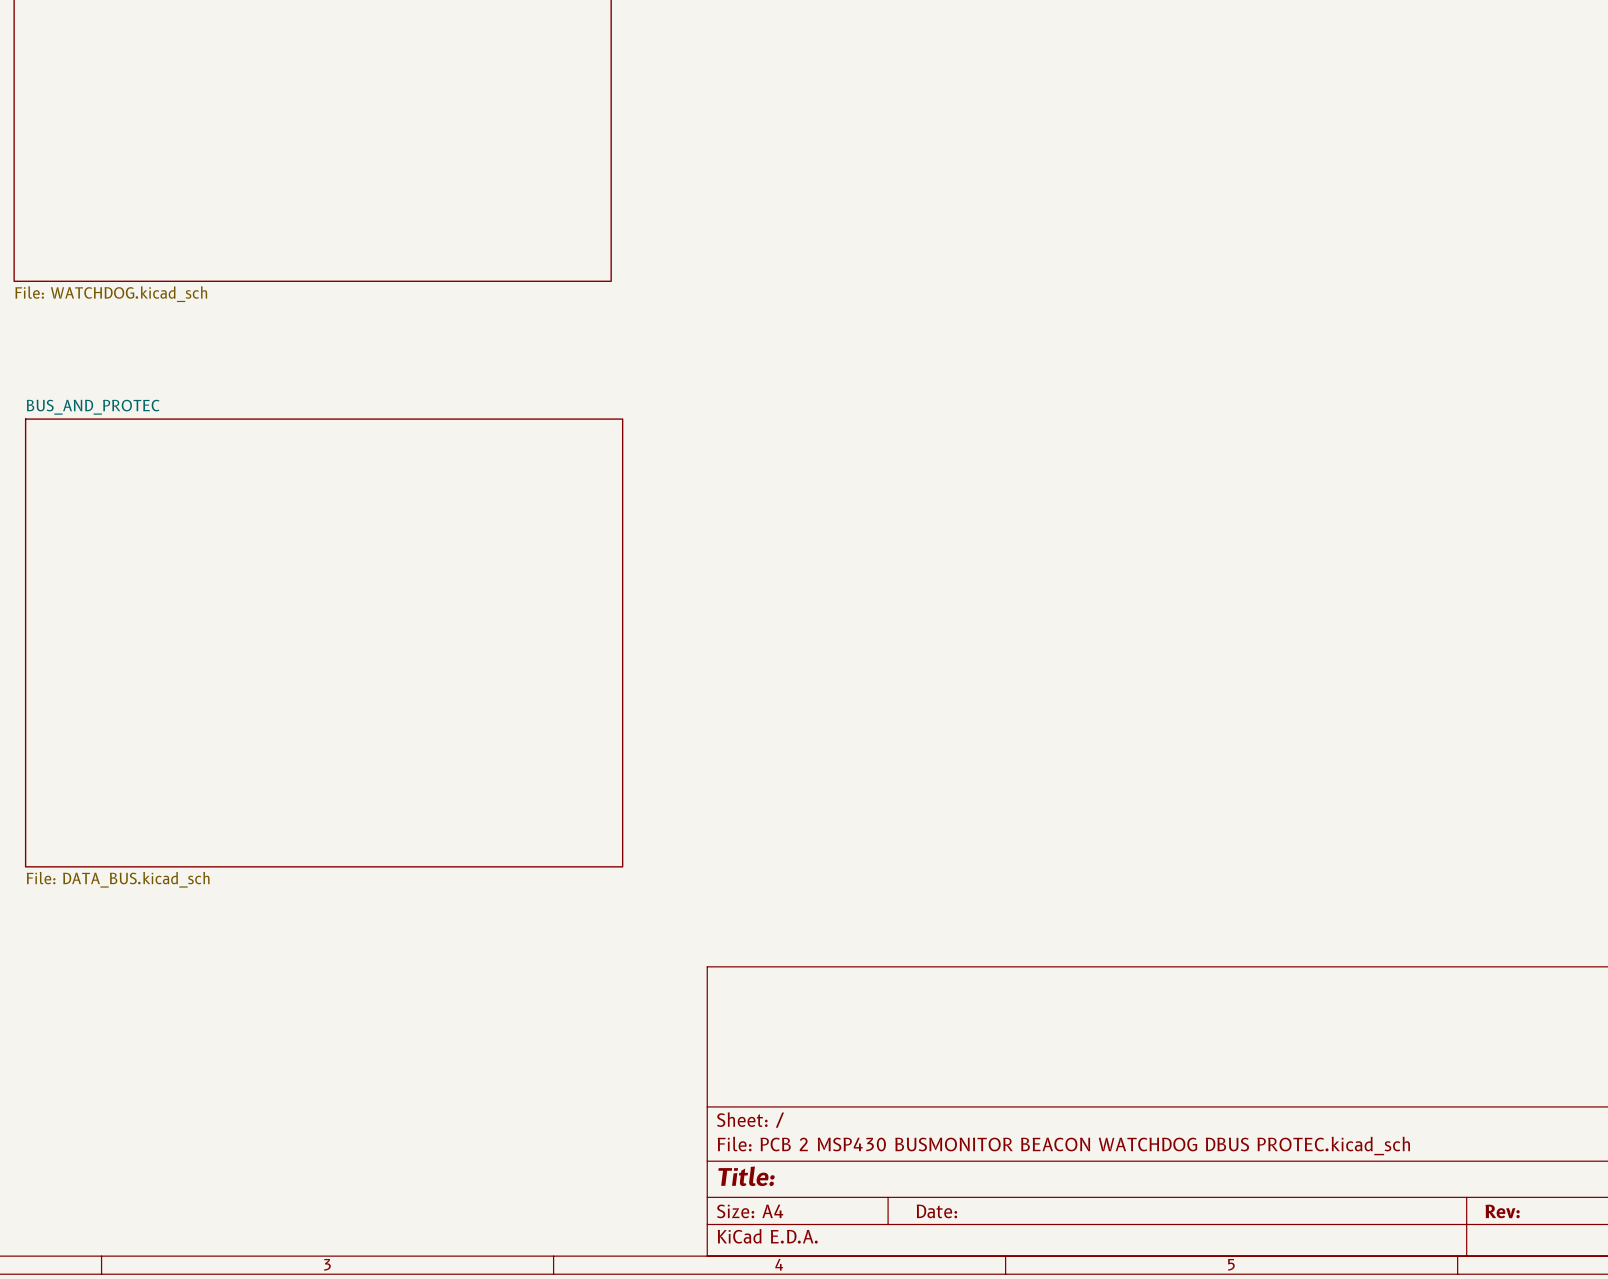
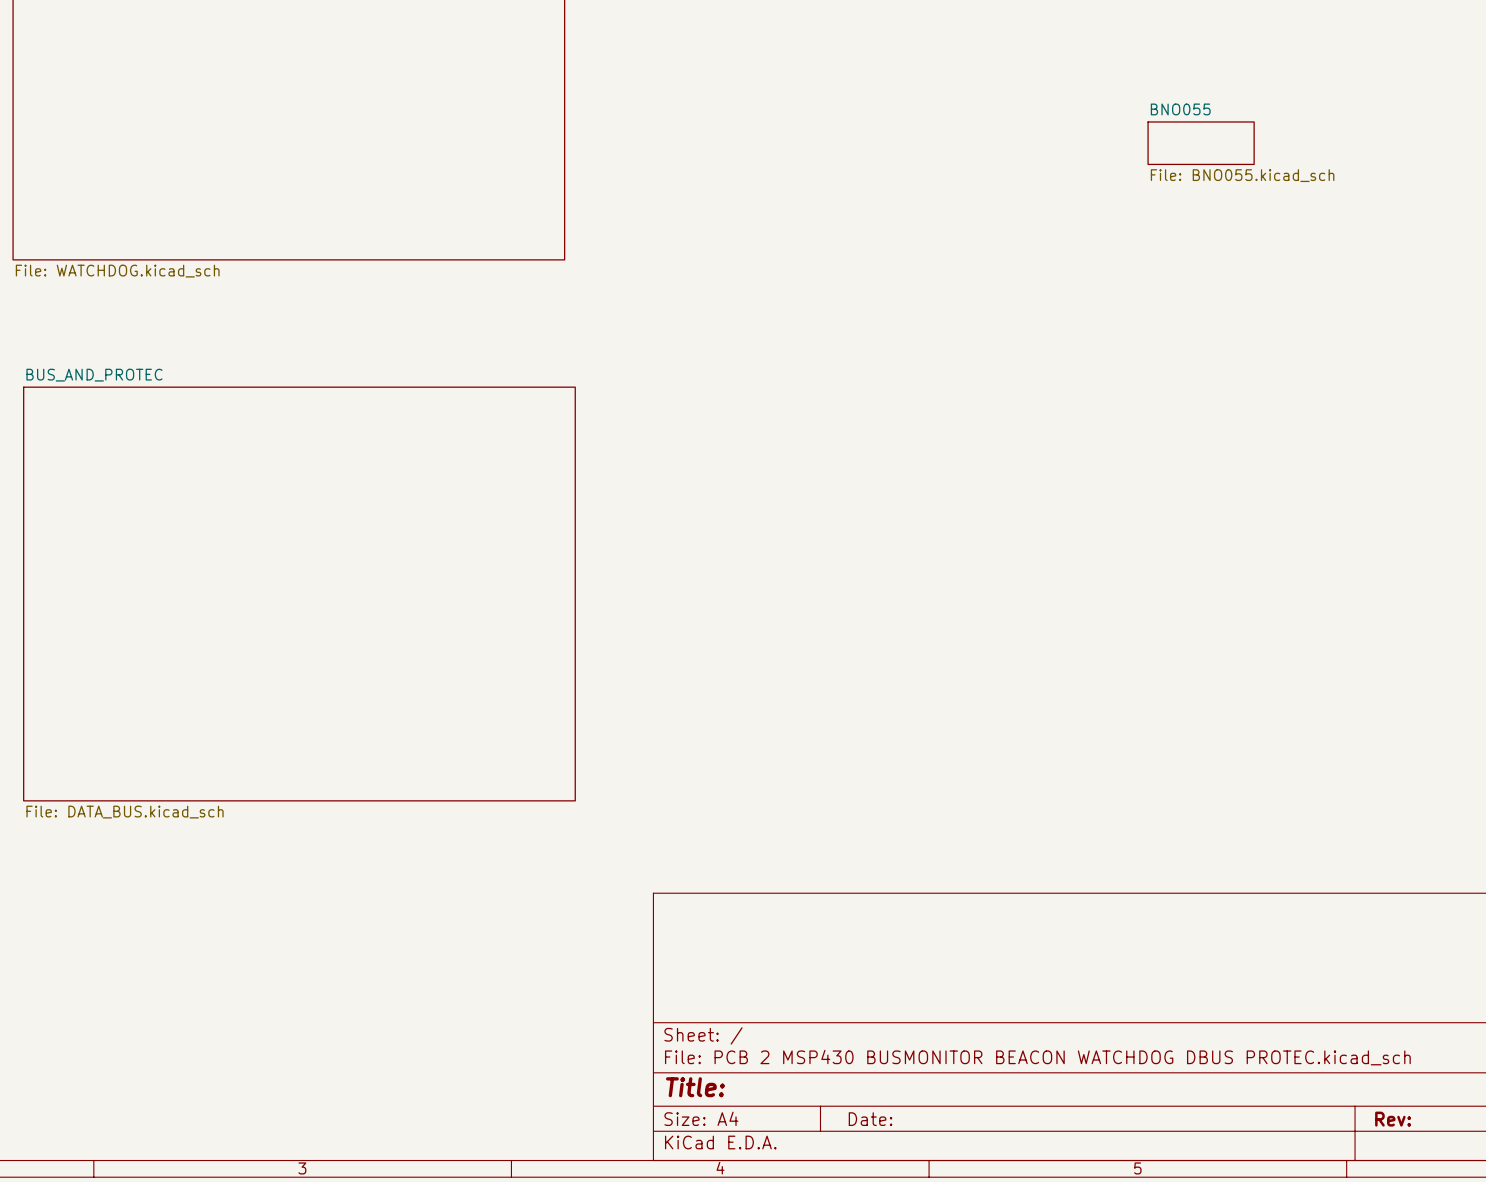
sheet BNO055: none -> File: BNO055.kicad_sch (1201, 143)

